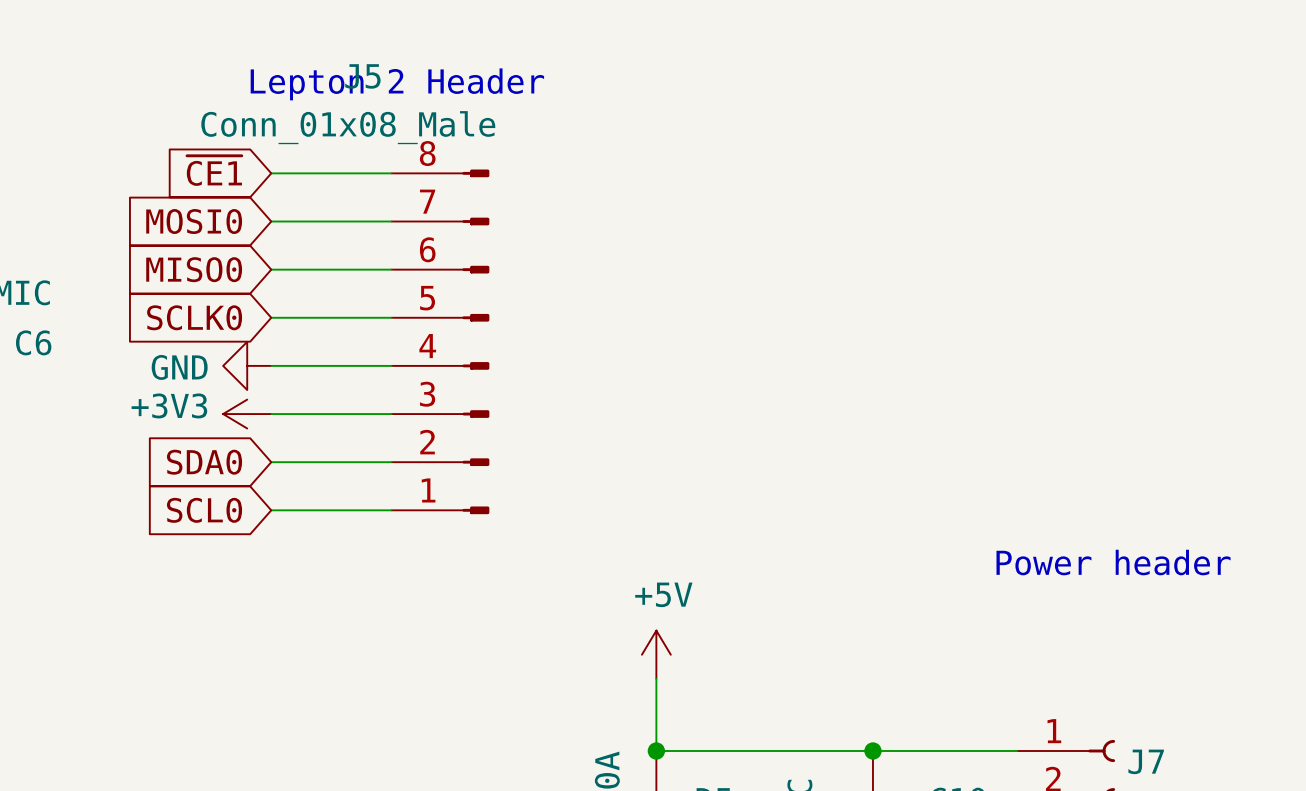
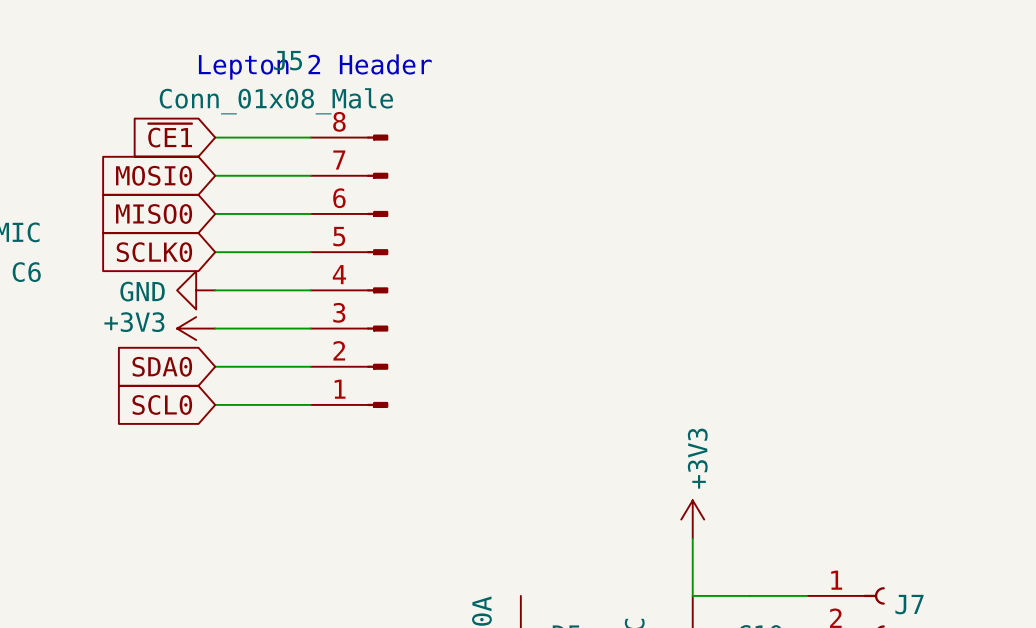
text: Power header (1113, 562) -> none
power symbol: +5V (656, 654) -> none
power symbol: none -> +3V3 (692, 519)
wire: (656, 678) (656, 751) (872, 751) -> (692, 538) (692, 595)
junction: (656, 751) -> none
junction: (872, 751) -> none

